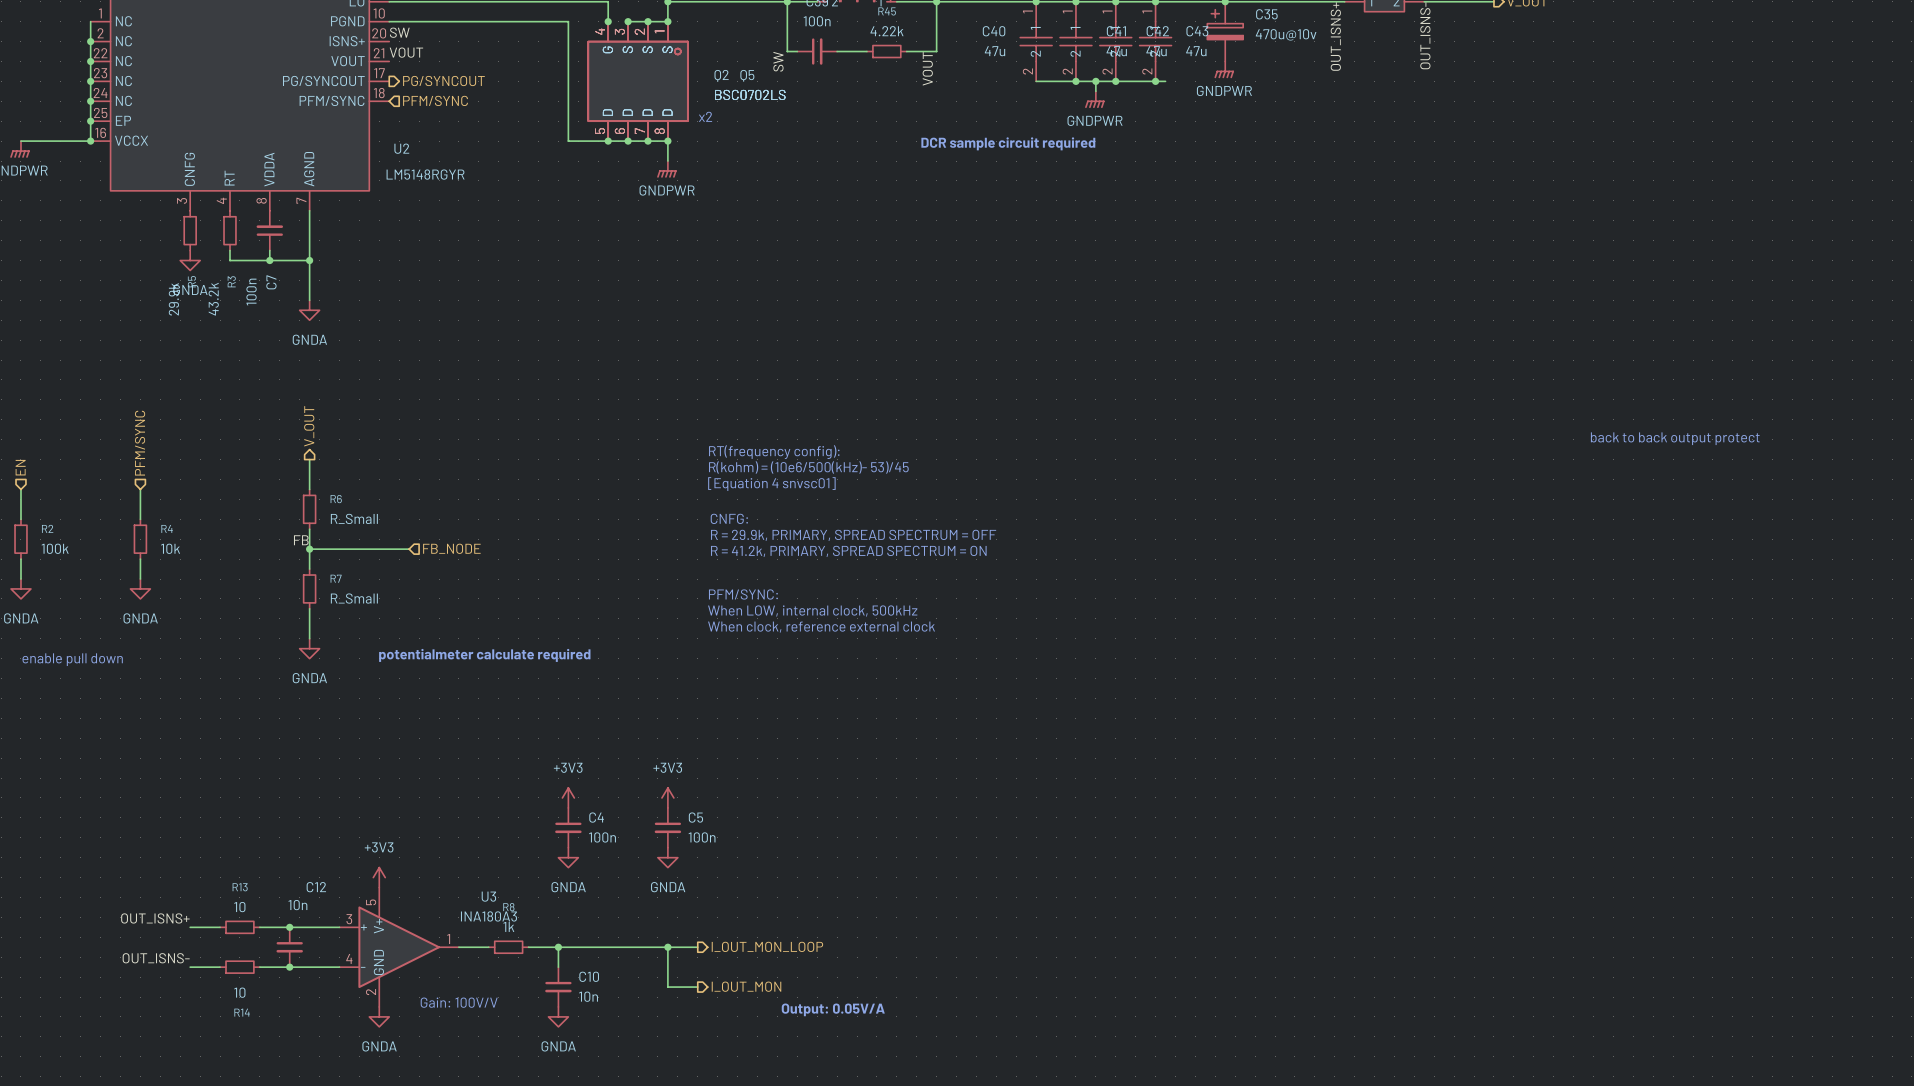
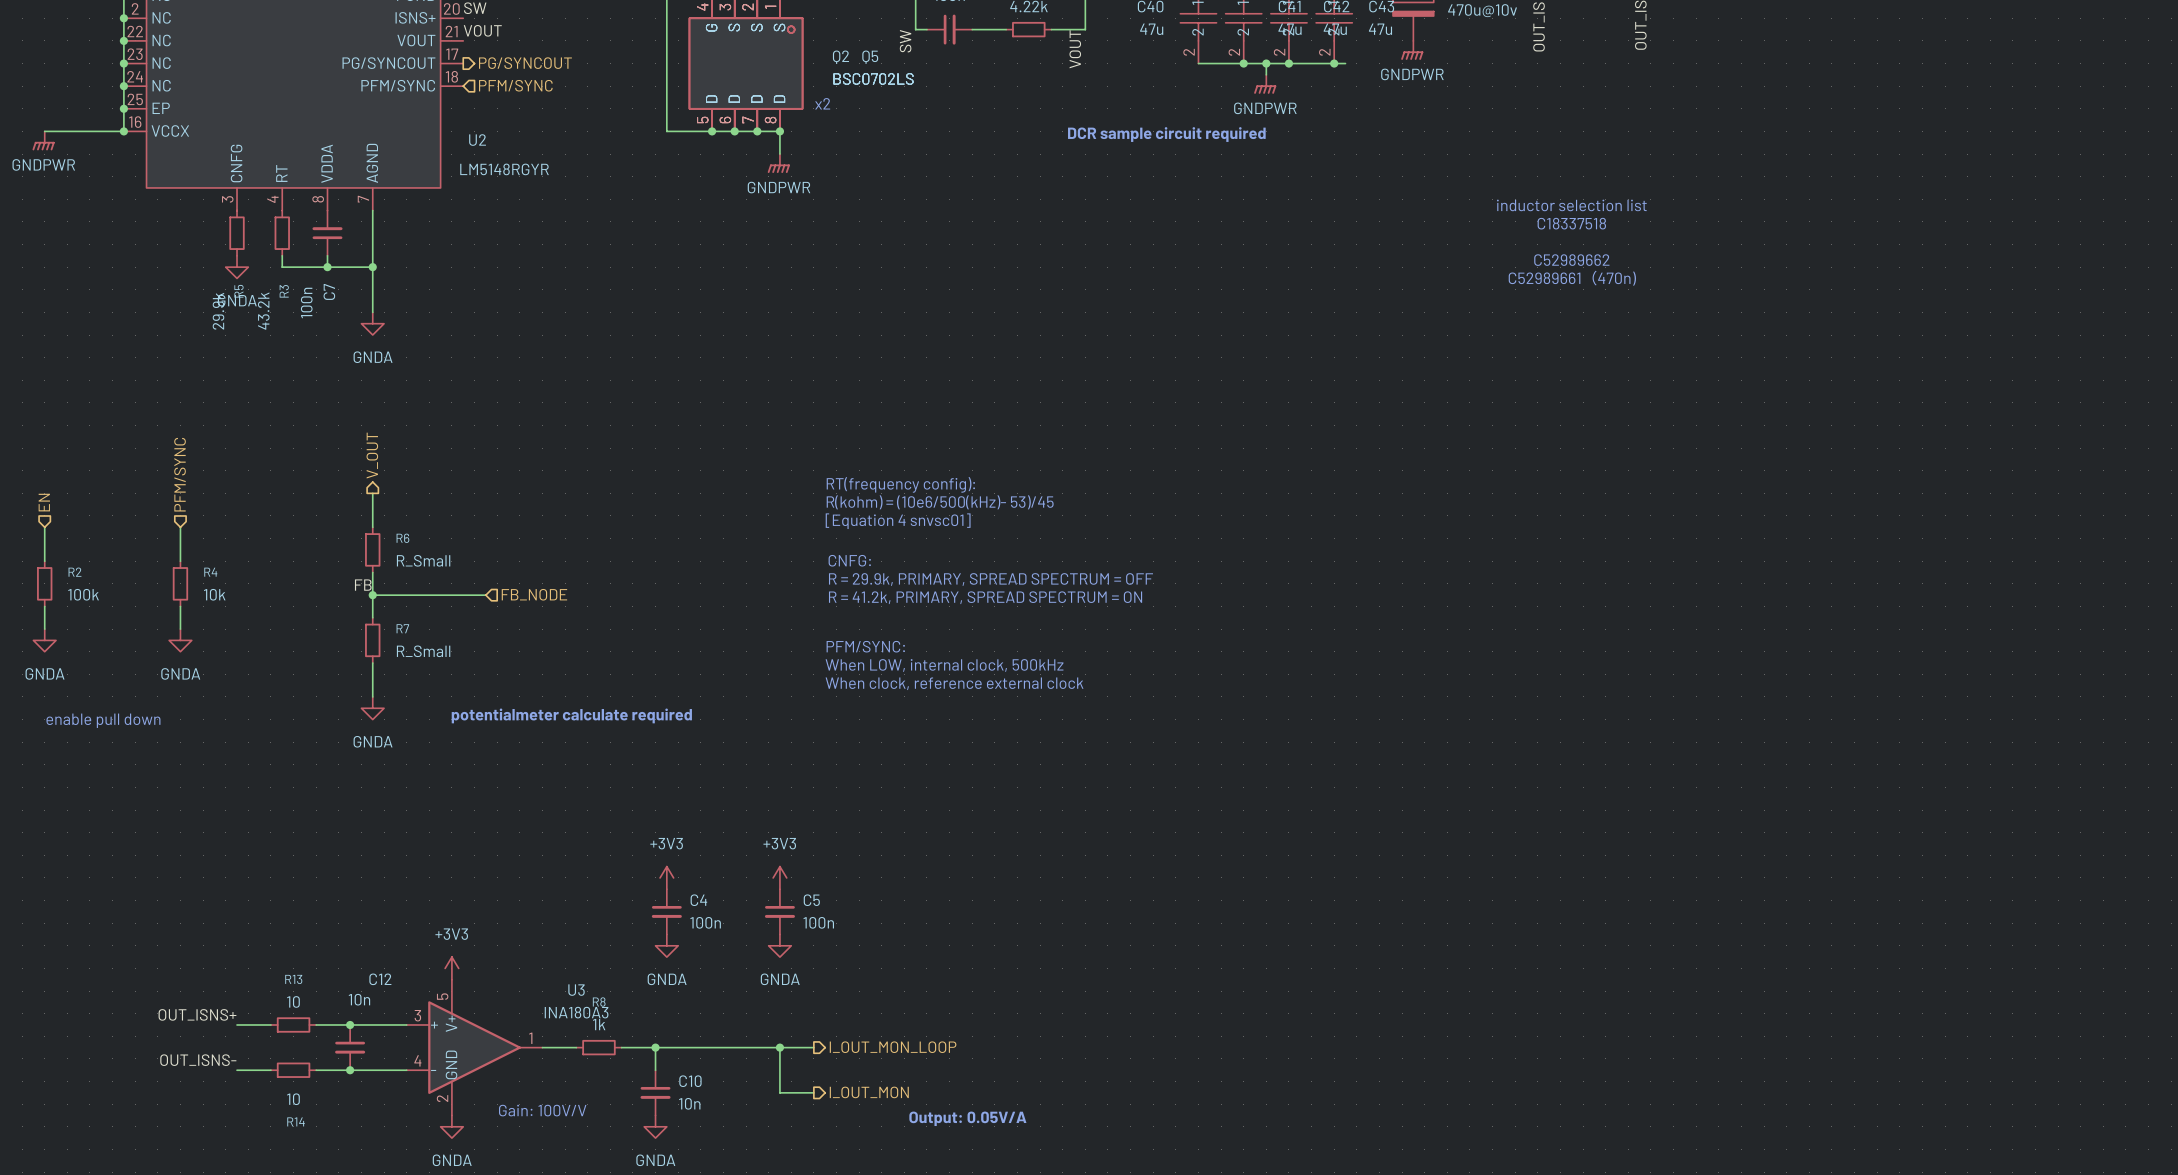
text: none -> inductor selection list (1571, 205)
text: none -> C18337518 (1571, 223)
text: none -> C52989662 (1571, 260)
text: none -> C52989661（470n) (1572, 278)
text: back to back output protect (1675, 438) -> none

